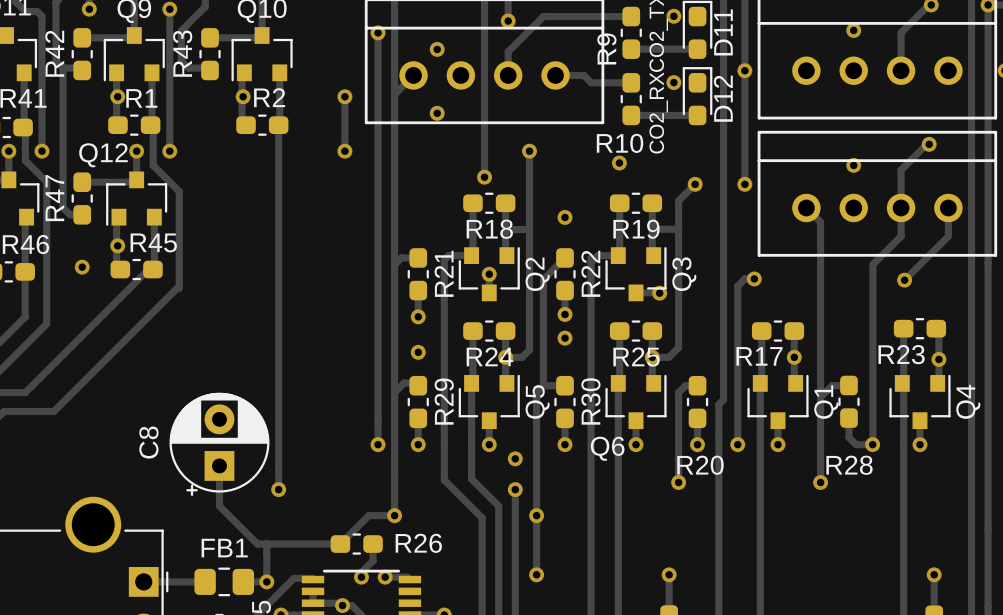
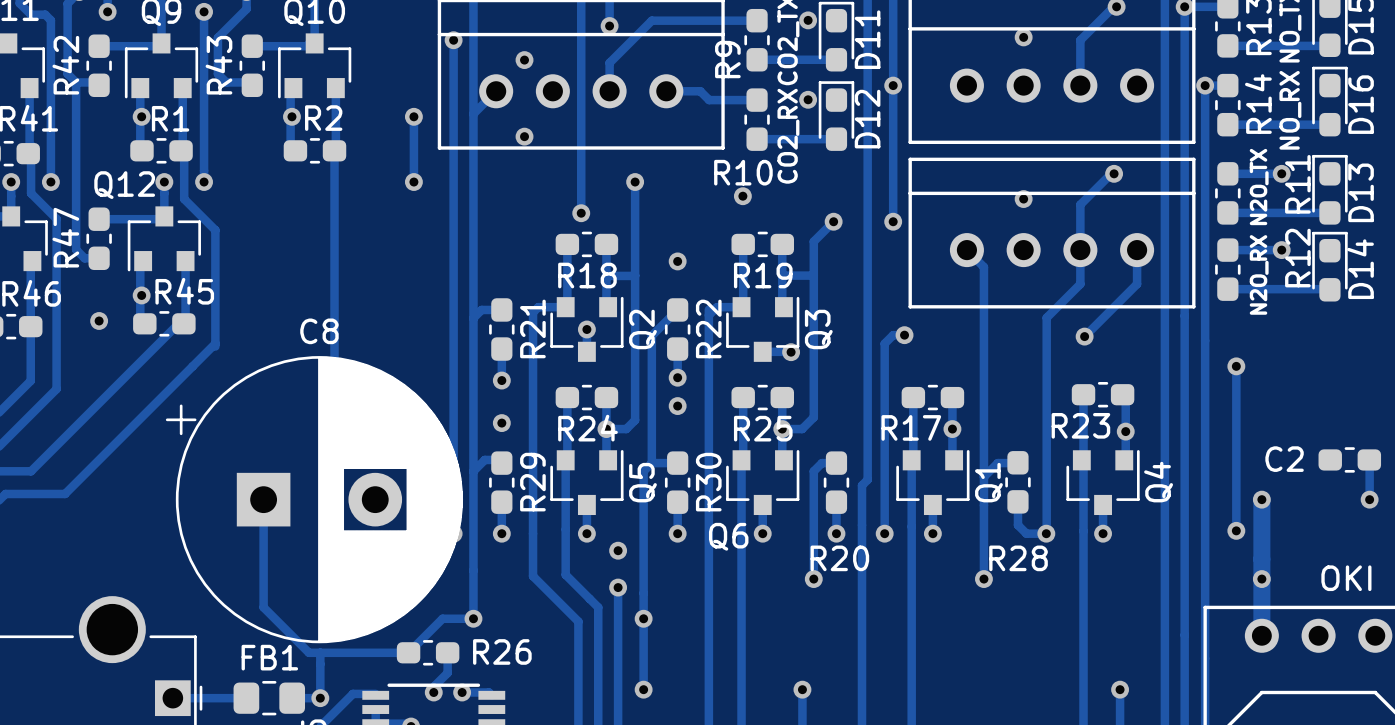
C8 footprint: [169, 392, 270, 497] -> [165, 356, 464, 644]
track: none -> (263, 499) (263, 559)
C8 name position: C8 (148, 442) -> C8 (319, 331)

